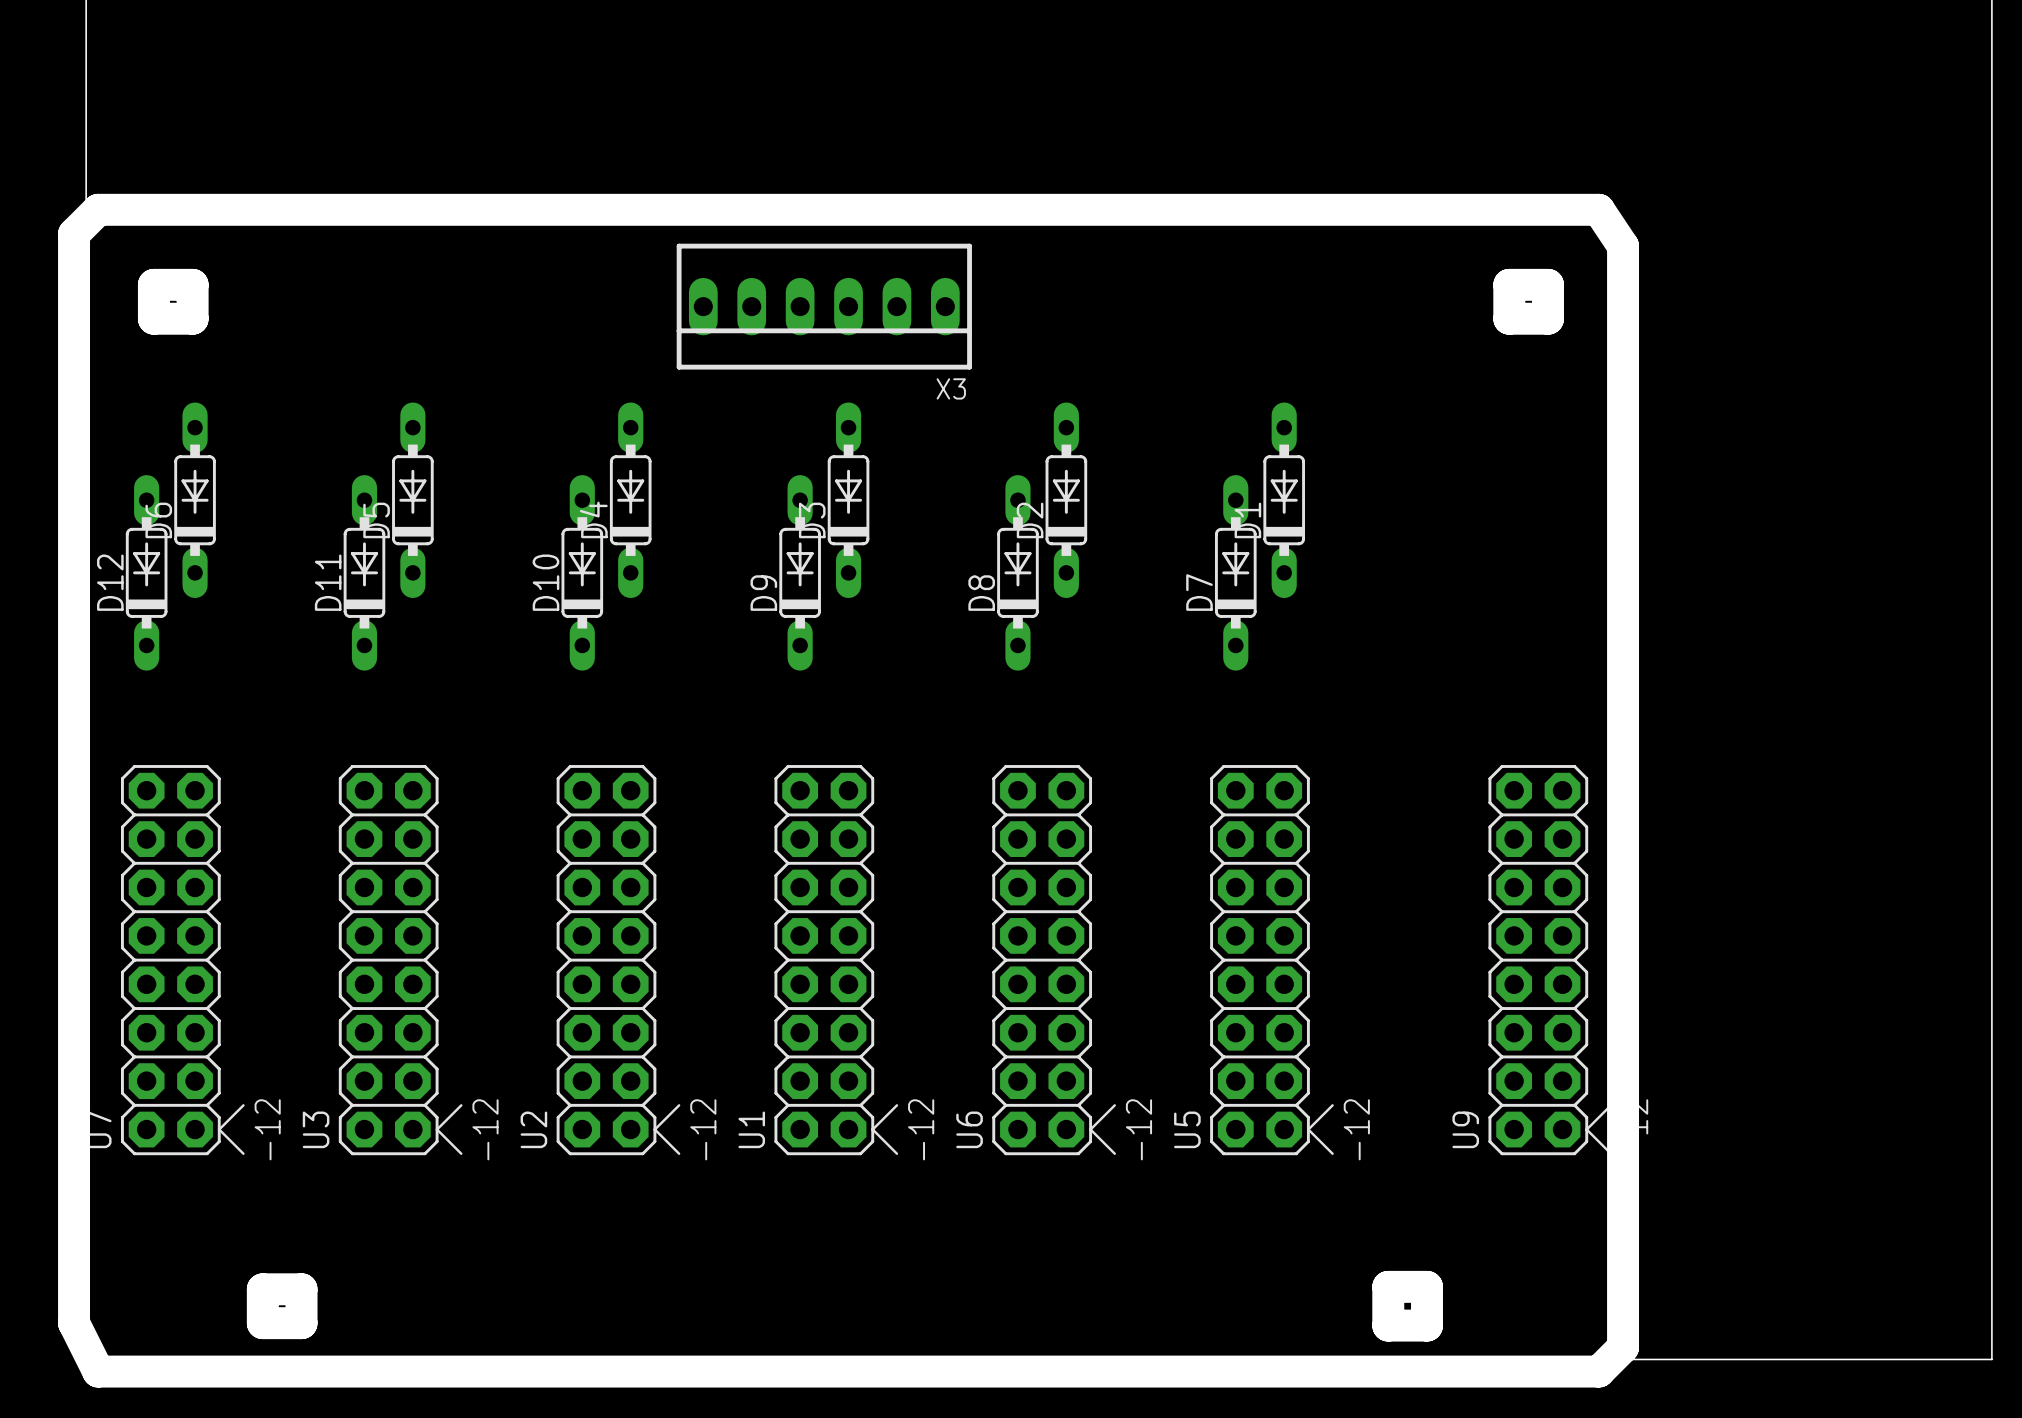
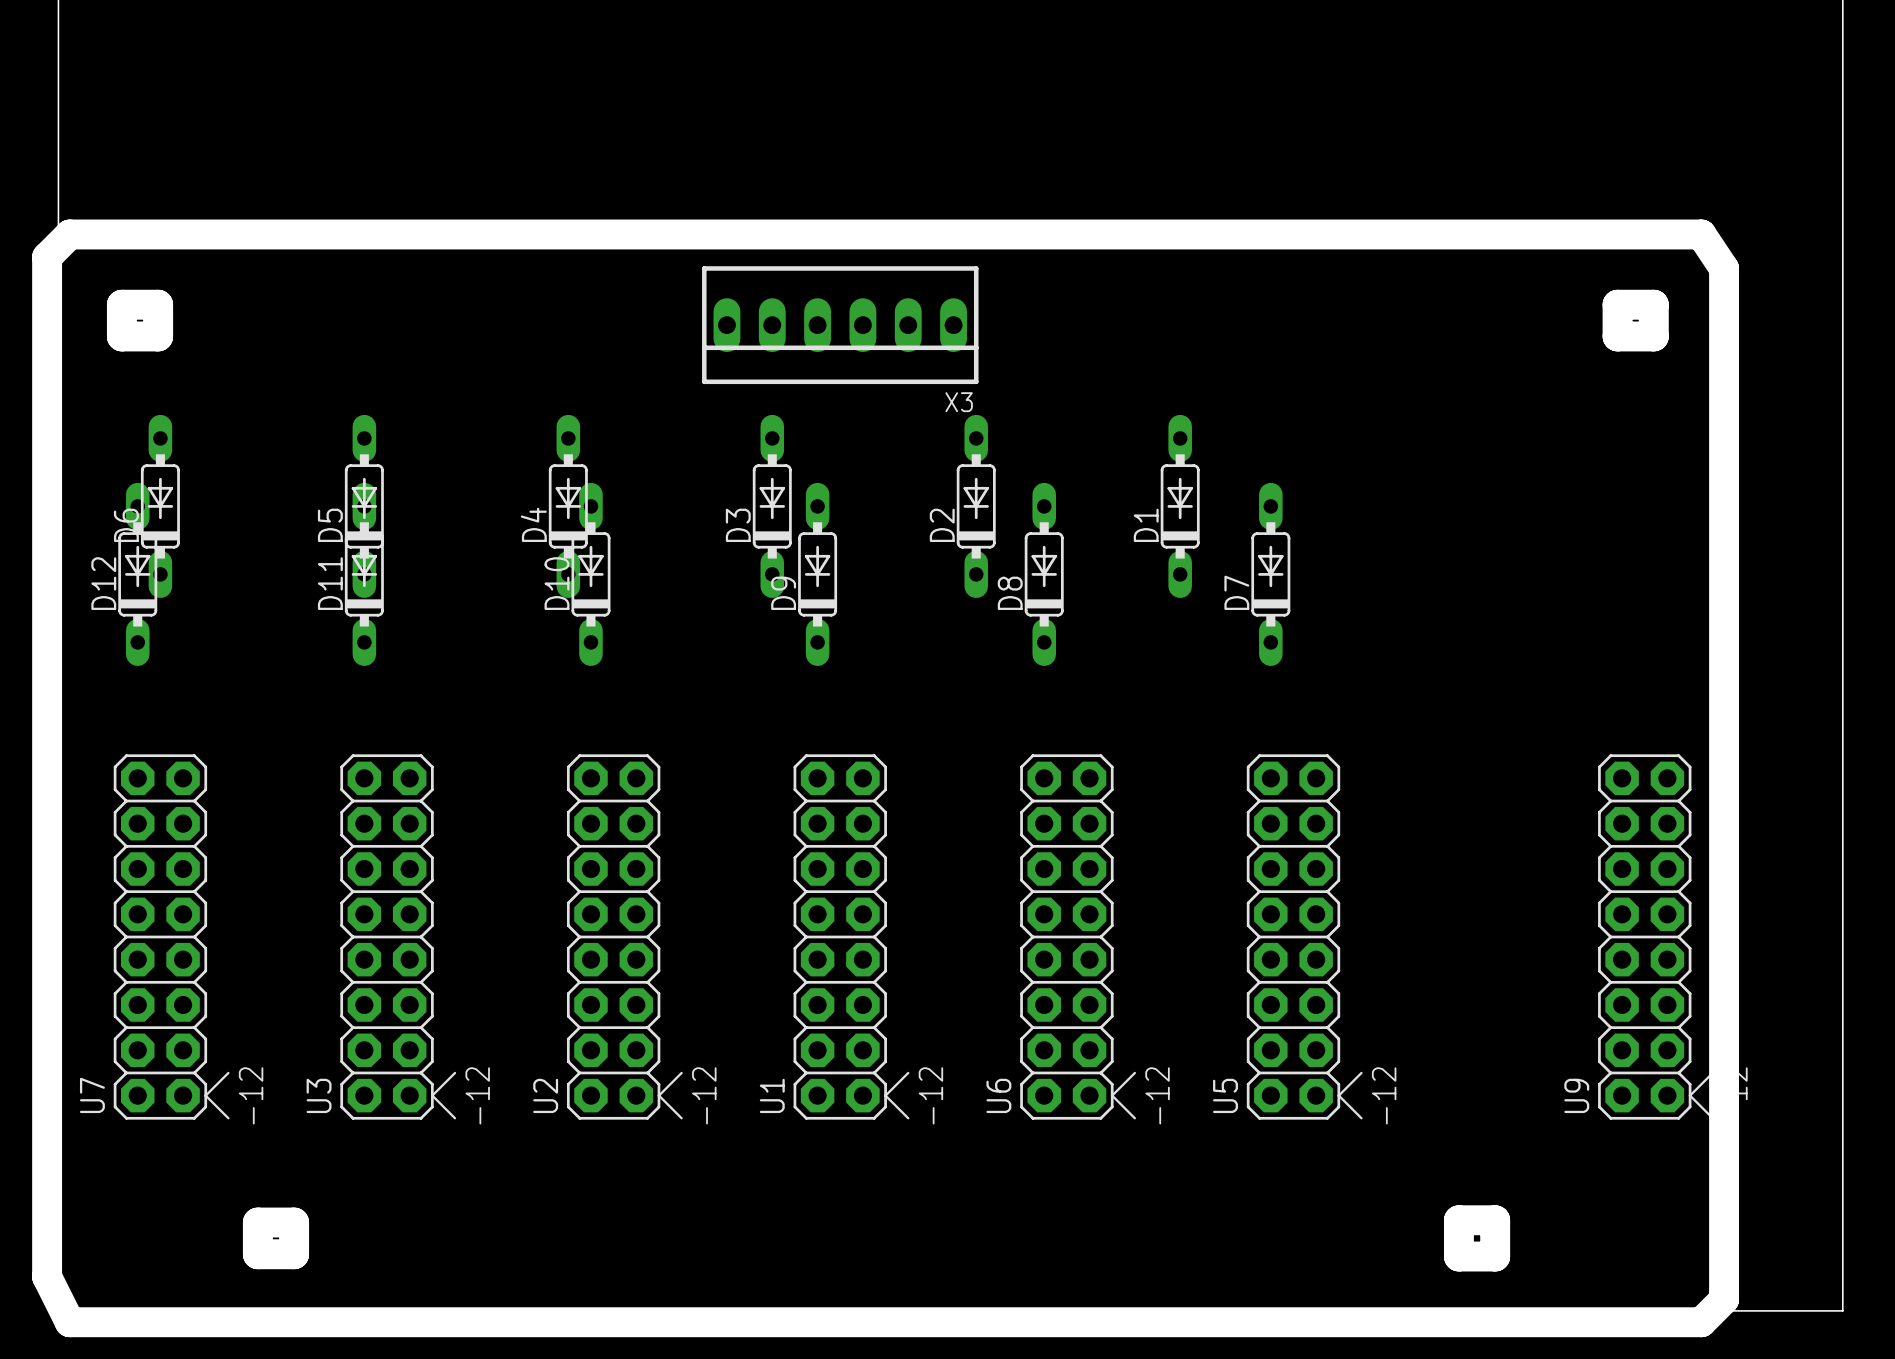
board edge: (1598, 209) (1623, 246) (1623, 1347) (1598, 1371) -> (1474, 234) (1701, 234) (1724, 268) (1724, 1299) (1701, 1322) (1474, 1322)
board edge: (1509, 284) (1548, 284) (1548, 318) (1509, 318) (1509, 284) -> (1617, 304) (1653, 304) (1653, 336) (1617, 336) (1617, 304)
X3 position: (824, 306) -> (840, 325)
D12 position: (146, 572) -> (137, 574)
D11 position: (364, 572) -> (364, 574)
D10 position: (582, 572) -> (590, 574)
D9 position: (800, 572) -> (817, 574)
D8 position: (1017, 572) -> (1044, 574)
D7 position: (1235, 572) -> (1270, 574)
U7 position: (182, 960) -> (171, 936)
U3 position: (400, 960) -> (398, 936)
U2 position: (618, 960) -> (624, 936)
U1 position: (836, 960) -> (851, 936)
U6 position: (1054, 960) -> (1078, 936)
U5 position: (1271, 960) -> (1304, 936)
U9 position: (1550, 960) -> (1655, 936)
board edge: (1388, 1286) (1388, 1325) (1426, 1325) (1426, 1286) (1388, 1286) -> (1458, 1220) (1458, 1256) (1495, 1256) (1495, 1220) (1458, 1220)
board edge: (262, 1289) (301, 1289) (301, 1323) (262, 1323) (262, 1289) -> (257, 1222) (294, 1222) (294, 1254) (257, 1254) (257, 1222)

